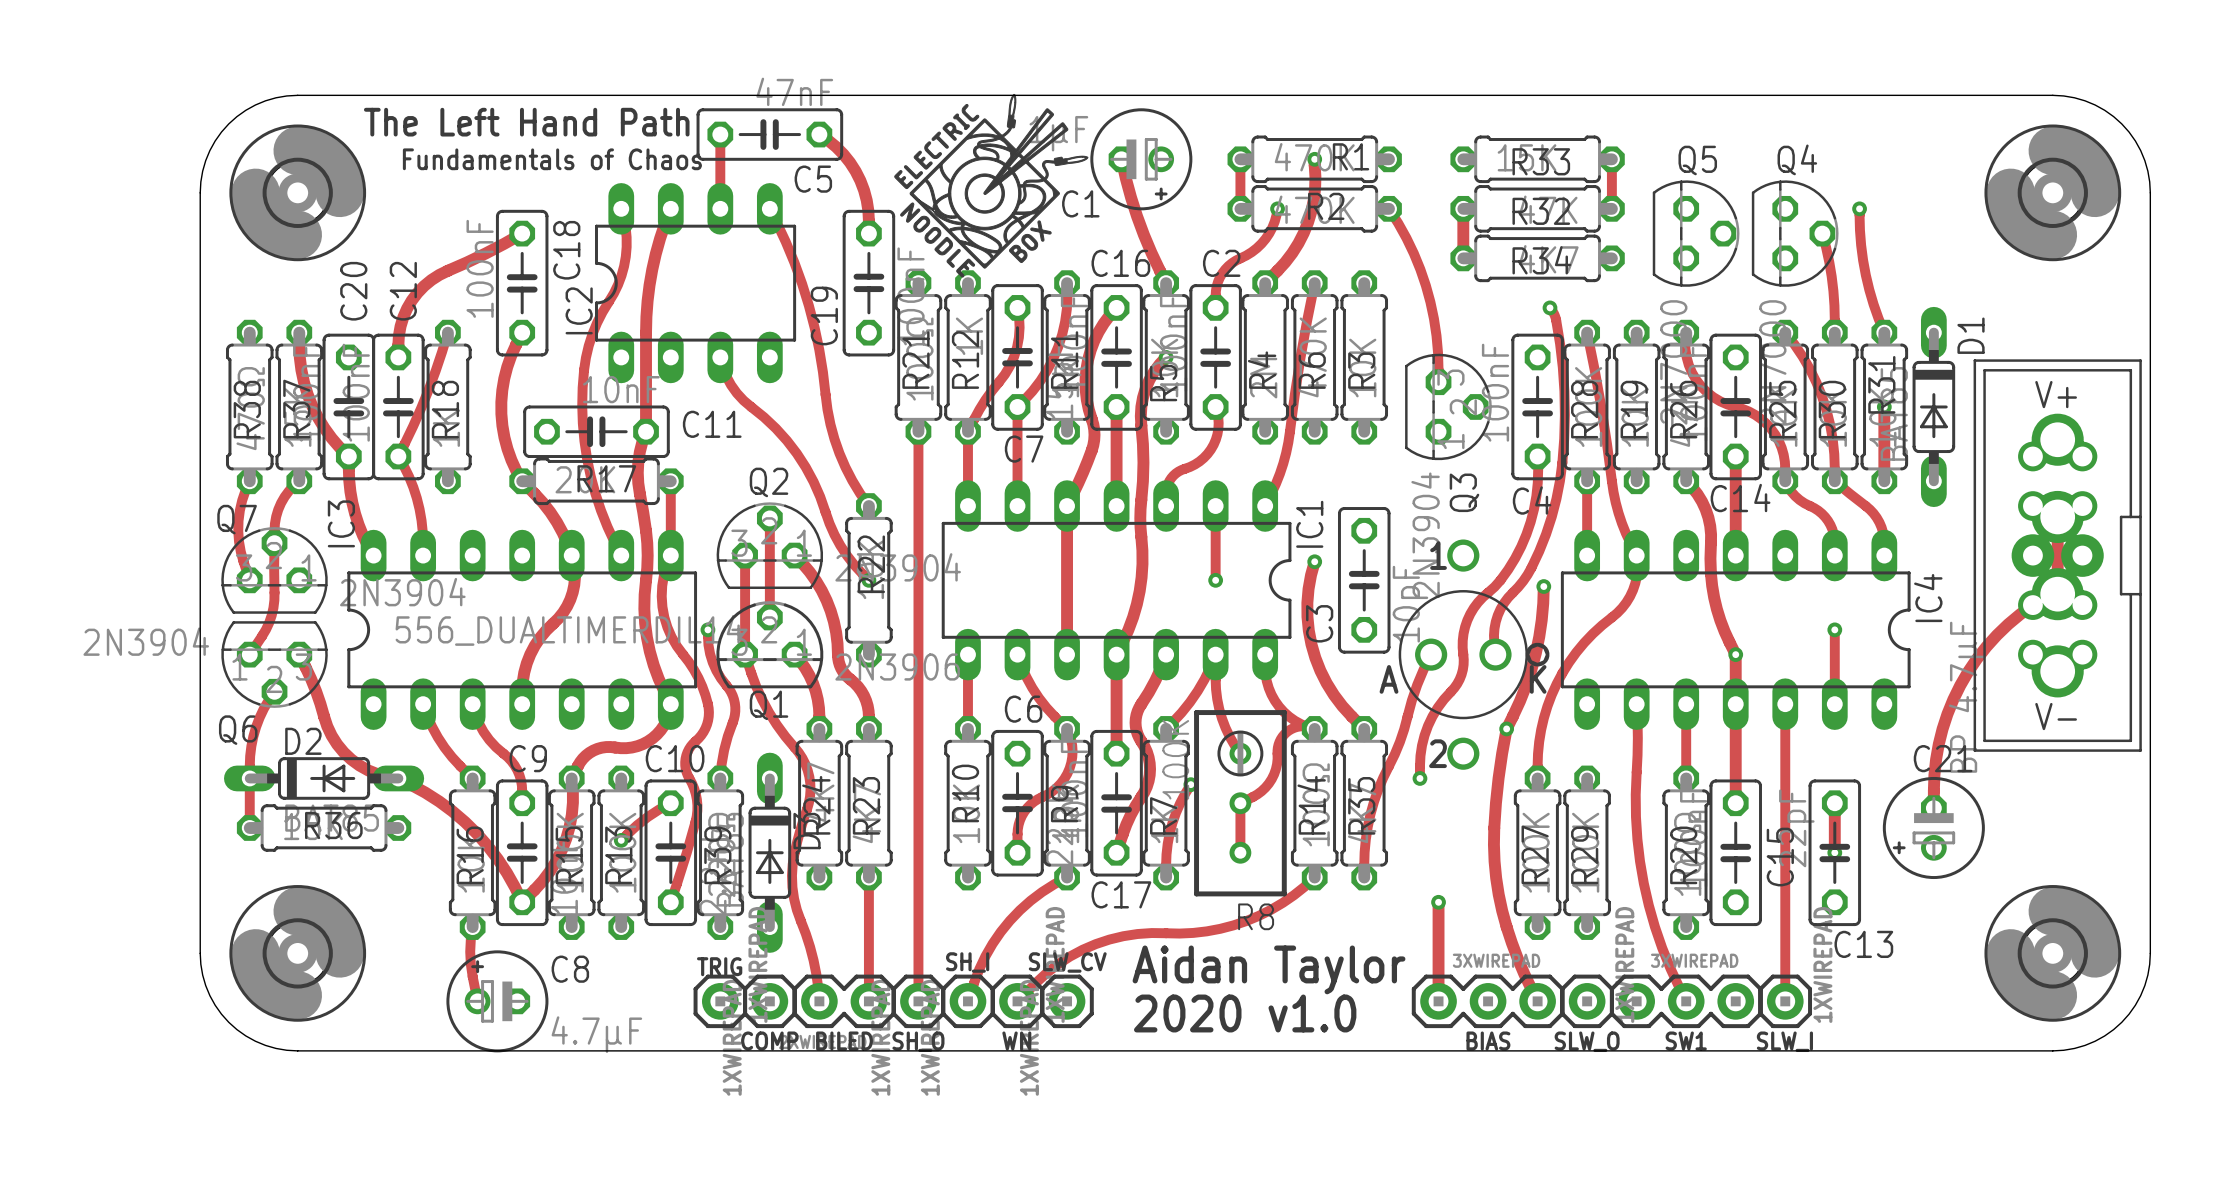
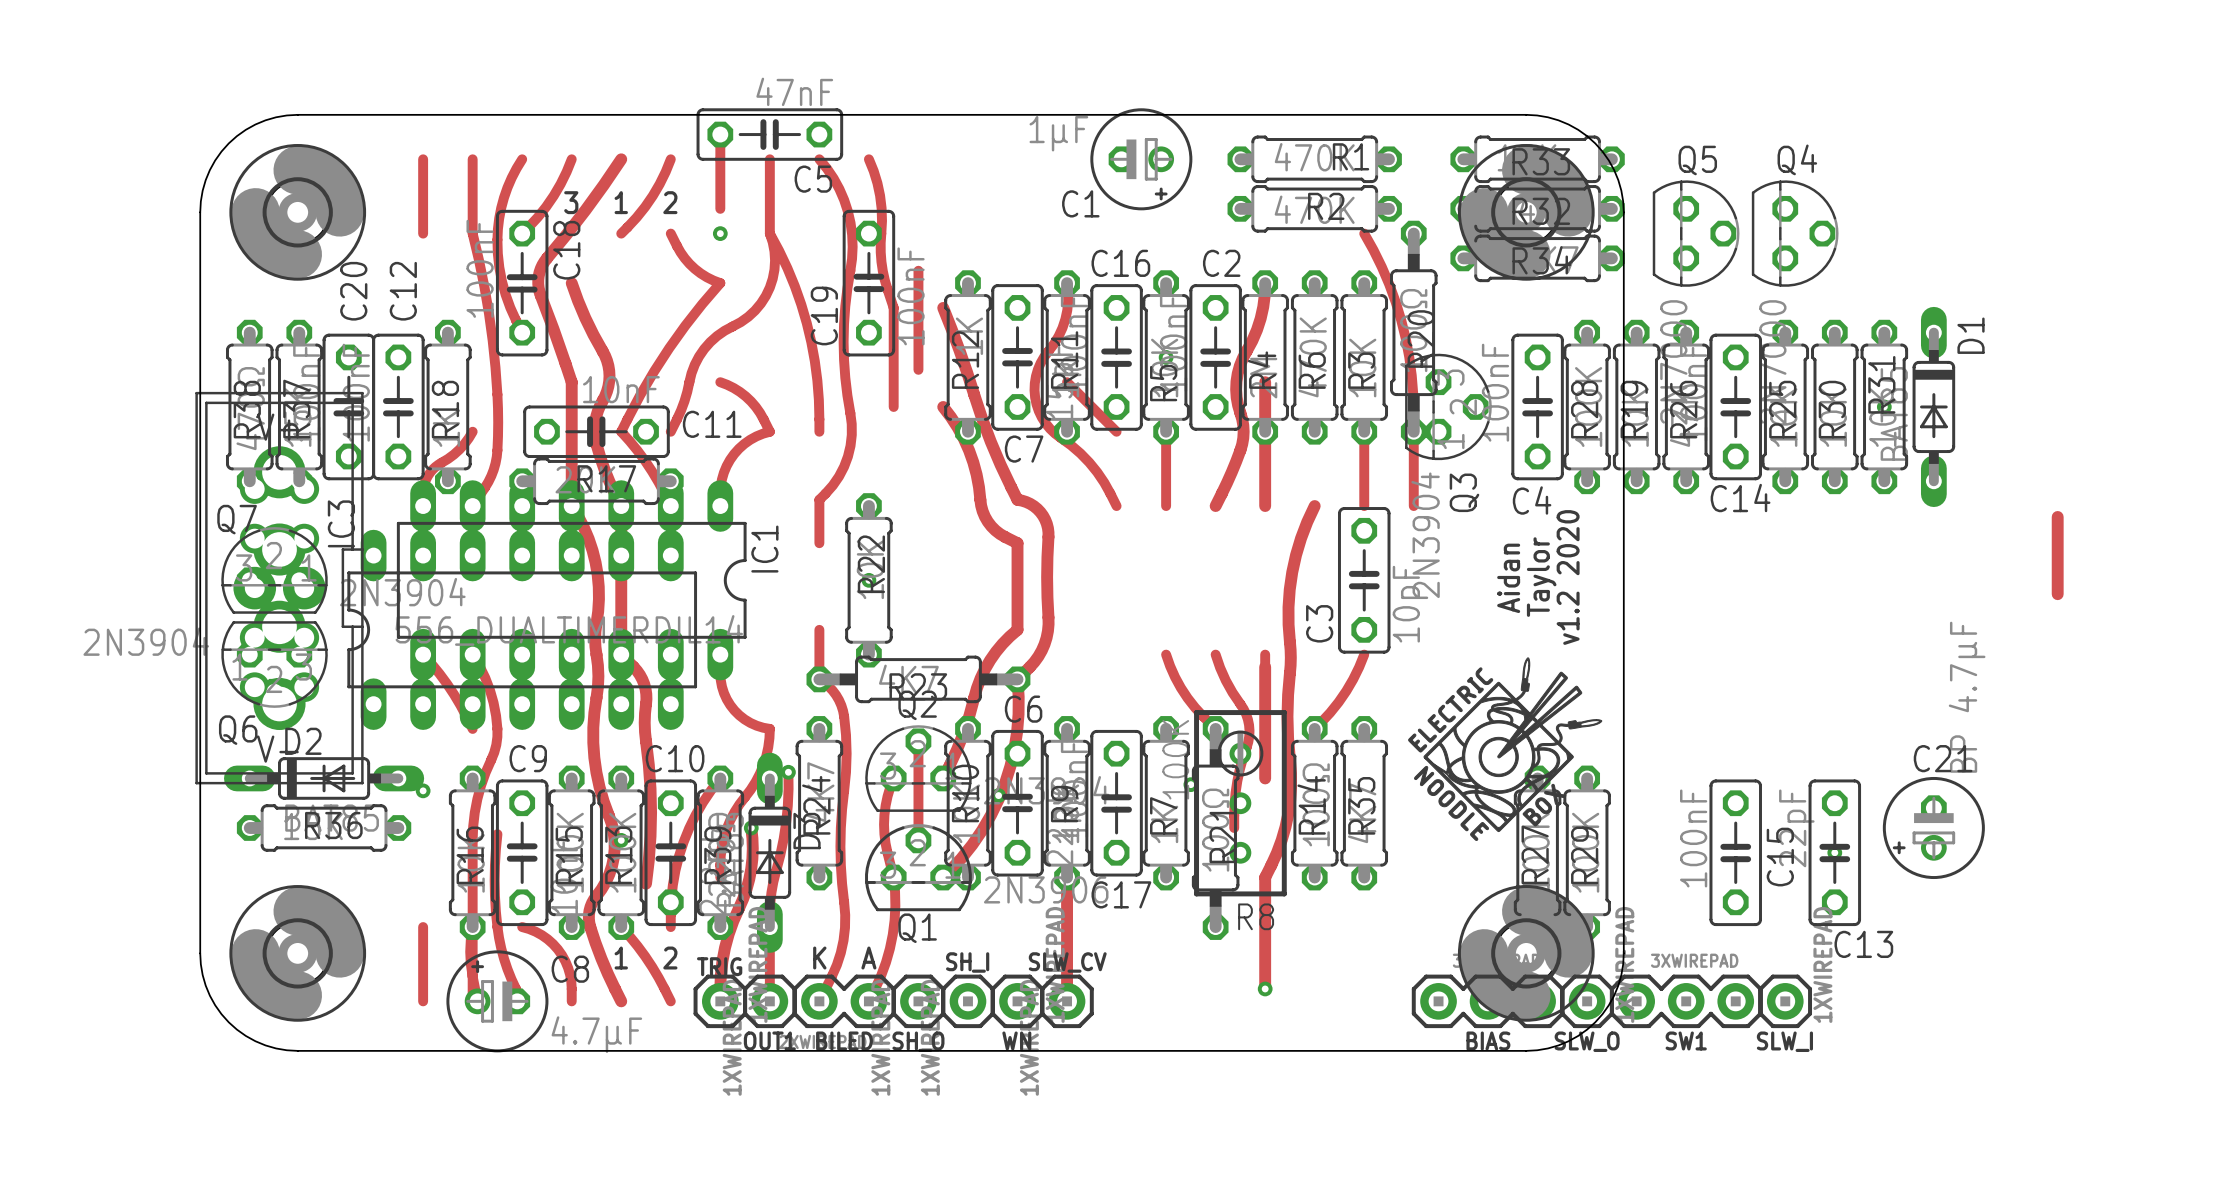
drawing: [894, 93, 1089, 278] -> none
text: The Left Hand Path (526, 122) -> none
track: (819, 134) (843, 154) (860, 180) (866, 200) (868, 233) -> none
track: none -> (423, 159) (423, 233)
track: none -> (472, 159) (472, 233) (484, 286) (492, 340) (498, 422) (497, 450) (493, 469) (488, 481) (472, 506)
text: Fundamentals of Chaos (552, 159) -> none
track: none -> (621, 159) (585, 210) (544, 261) (538, 280) (539, 291) (571, 382) (571, 506) (588, 538) (597, 574) (598, 599) (595, 639) (598, 676) (593, 742) (596, 772) (611, 823) (614, 849) (609, 874) (592, 903) (588, 918) (595, 942) (615, 988)
track: none -> (670, 159) (652, 195) (636, 217) (621, 233)
track: none -> (769, 159) (769, 233)
track: none -> (819, 159) (833, 178) (844, 200) (850, 223) (852, 246) (845, 306) (843, 341) (851, 434) (844, 466) (832, 485) (819, 499) (819, 543)
track: none -> (868, 159) (880, 195) (881, 261) (893, 307) (893, 406)
track: (1121, 159) (1137, 216) (1166, 283) -> none
track: (1240, 159) (1240, 208) -> none
track: (1314, 159) (1315, 188) (1308, 222) (1292, 253) (1265, 283) -> none
via: (1314, 159) -> none
track: (1611, 159) (1611, 208) -> none
part position: (297, 192) -> (297, 212)
part: (2052, 192) -> none
text: none -> 3 (571, 202)
text: none -> 1 (621, 202)
text: none -> 2 (670, 202)
track: (621, 208) (626, 237) (624, 266) (618, 284) (597, 323) (588, 345) (584, 369) (582, 405) (584, 441) (590, 476) (600, 510) (621, 555) -> none
track: (670, 208) (655, 254) (649, 285) (646, 332) (646, 431) (639, 451) (637, 472) (647, 543) (644, 608) (646, 637) (653, 665) (670, 704) (670, 709) (660, 730) (647, 741) (632, 747) (597, 748) (589, 752) (580, 762) (571, 778) (571, 814) (561, 849) (542, 880) (522, 902) (506, 872) (487, 846) (452, 811) (425, 792) (398, 778) (368, 770) (343, 752) (327, 726) (316, 691) (299, 654) -> none
track: (769, 208) (794, 262) (808, 305) (819, 349) (827, 409) (834, 439) (852, 480) (868, 506) -> none
track: (1277, 208) (1272, 227) (1261, 243) (1251, 252) (1232, 263) (1222, 273) (1216, 286) (1215, 307) -> none
via: (1277, 208) -> none
track: (1389, 208) (1406, 238) (1425, 285) (1436, 335) (1438, 382) -> none
track: (1463, 208) (1463, 258) -> none
track: (1859, 208) (1861, 245) (1865, 275) (1873, 304) (1884, 332) -> none
via: (1859, 208) -> none
board edge: (200, 212) (202, 171) (209, 150) (221, 132) (236, 116) (255, 105) (276, 97) (297, 95) (2052, 95) (2085, 100) (2104, 110) (2121, 123) (2135, 140) (2144, 160) (2150, 192) (2150, 953) (2144, 985) (2135, 1005) (2121, 1022) (2104, 1035) (2085, 1045) (2063, 1050) (1526, 1050) -> (200, 212) (205, 180) (221, 151) (245, 129) (265, 120) (286, 115) (1526, 114) (1558, 120) (1578, 129) (1595, 143) (1608, 160) (1618, 180) (1623, 212) (1623, 964) (1618, 985) (1608, 1005) (1587, 1029) (1558, 1045) (1526, 1050)
part: none -> (1526, 212)
track: (522, 233) (439, 274) (424, 286) (411, 300) (403, 317) (398, 335) (398, 357) -> (522, 233) (537, 217) (553, 195) (571, 159)
track: none -> (670, 233) (680, 252) (689, 263) (706, 277) (720, 283) (669, 348) (640, 394) (621, 431) (645, 461) (670, 506)
via: none -> (720, 233)
track: none -> (769, 233) (794, 286) (806, 323) (817, 380) (819, 431)
track: none -> (769, 233) (775, 260) (772, 278) (765, 295) (748, 316) (717, 336) (704, 349) (694, 364) (684, 401) (670, 431)
track: none -> (1364, 233) (1381, 266) (1395, 302) (1409, 356) (1413, 394) (1413, 506)
track: (1822, 233) (1831, 276) (1834, 332) -> none
R21 footprint: [894, 270, 943, 445] -> [1191, 716, 1240, 940]
track: none -> (571, 283) (585, 318) (605, 355) (609, 370) (608, 386) (596, 416) (594, 433) (604, 469) (621, 506) (621, 654) (639, 674) (646, 694) (645, 732) (651, 812) (646, 883)
IC2: (695, 283) -> none
track: (1067, 283) (1066, 308) (1058, 346) (1040, 380) (1017, 406) (1017, 506) -> (1067, 283) (1067, 310) (1062, 327) (1040, 363) (1035, 376) (1034, 390) (1036, 404) (1041, 417) (1050, 428) (1080, 453) (1097, 472) (1116, 506)
track: (1314, 283) (1300, 357) (1286, 453) (1279, 473) (1265, 506) -> (1265, 382) (1265, 506)
track: none -> (943, 307) (990, 441) (1011, 487) (1017, 499) (1033, 506) (1043, 515) (1046, 523) (1048, 624) (1041, 650) (1034, 661) (1017, 679) (1018, 714) (1014, 749) (998, 799) (972, 844) (943, 877)
track: (1017, 307) (1018, 337) (1014, 356) (1004, 374) (979, 409) (967, 431) (967, 506) -> none
track: (1116, 307) (1103, 323) (1094, 340) (1086, 369) (1086, 399) (1093, 424) (1094, 440) (1083, 472) (1067, 506) (1067, 654) -> none
track: (1549, 307) (1556, 320) (1564, 391) (1564, 438) (1559, 480) (1551, 516) (1539, 551) (1527, 574) (1504, 603) (1497, 615) (1493, 635) (1495, 654) -> none
via: (1549, 307) -> none
track: (299, 332) (301, 370) (307, 394) (324, 428) (348, 456) (350, 491) (355, 513) (362, 535) (373, 555) -> none
track: (447, 332) (428, 389) (398, 456) (409, 476) (416, 498) (421, 520) (423, 555) -> none
track: (522, 332) (511, 355) (504, 378) (501, 402) (504, 437) (511, 460) (522, 481) (542, 502) (562, 532) (571, 555) (574, 577) (572, 592) (567, 606) (540, 637) (530, 654) (524, 672) (522, 704) -> (522, 332) (510, 307) (501, 281) (497, 239) (499, 218) (503, 197) (511, 177) (522, 159)
track: (1587, 332) (1601, 406) (1613, 491) (1621, 523) (1636, 555) (1636, 576) (1633, 590) (1626, 602) (1584, 642) (1568, 662) (1556, 683) (1547, 706) (1541, 729) (1537, 778) -> none
track: (1686, 332) (1686, 357) (1696, 379) (1713, 397) (1755, 415) (1771, 429) (1778, 441) (1783, 454) (1785, 481) (1787, 486) (1799, 500) (1818, 510) (1828, 520) (1833, 533) (1834, 555) -> none
track: (1785, 332) (1802, 356) (1822, 396) (1832, 439) (1834, 481) (1869, 509) (1876, 517) (1883, 532) (1884, 555) -> none
track: (720, 357) (726, 376) (736, 393) (775, 428) (796, 453) (813, 481) (840, 545) (854, 565) (868, 580) -> none
track: (1166, 357) (1149, 379) (1141, 406) (1143, 462) (1140, 518) (1141, 577) (1133, 617) (1116, 654) (1116, 753) -> none
track: none -> (720, 382) (733, 388) (751, 401) (760, 412) (769, 431) (756, 436) (744, 443) (730, 459) (721, 479) (720, 506)
track: none -> (1067, 382) (1116, 431)
track: none -> (943, 406) (957, 427) (969, 450) (976, 474) (981, 505) (984, 516) (995, 530) (1017, 543) (1017, 629) (996, 651) (984, 669) (976, 688) (963, 732) (943, 778)
track: (1116, 406) (1116, 506) -> (918, 270) (918, 369)
track: (1215, 406) (1218, 428) (1213, 444) (1199, 461) (1173, 475) (1168, 483) (1166, 493) -> (1166, 431) (1166, 493)
track: (1884, 406) (1884, 481) -> none
track: none -> (472, 431) (459, 449) (435, 466) (428, 475) (423, 486) (423, 506)
track: (918, 431) (918, 741) -> none
track: (1537, 456) (1536, 496) (1526, 534) (1508, 569) (1494, 586) (1478, 602) (1467, 620) (1462, 640) (1463, 664) (1461, 674) (1454, 688) (1437, 707) (1428, 725) (1422, 745) (1419, 778) -> none
track: (1735, 456) (1735, 555) -> none
track: (249, 481) (239, 510) (238, 531) (240, 551) (249, 580) -> none
track: (299, 481) (284, 496) (276, 516) (273, 607) (266, 629) (249, 654) -> none
track: (670, 481) (670, 555) (662, 585) (662, 606) (671, 637) (693, 669) (702, 686) (708, 712) (705, 728) (690, 746) (685, 758) (686, 772) (695, 793) (697, 810) (686, 852) (670, 902) -> none
track: (1587, 481) (1587, 555) -> (1364, 431) (1364, 506)
track: (1686, 481) (1702, 501) (1708, 517) (1714, 597) (1720, 620) (1735, 654) (1735, 803) -> none
track: (1215, 506) (1215, 580) -> (1215, 506) (1242, 444) (1243, 425) (1236, 397) (1236, 381) (1239, 365) (1260, 318) (1265, 283)
track: none -> (1314, 506) (1301, 538) (1289, 589) (1288, 624) (1290, 657) (1287, 716) (1291, 786) (1285, 827) (1276, 852) (1265, 877) (1265, 988)
track: (769, 518) (769, 617) -> none
IC1 name position: IC1 (1309, 524) -> IC1 (764, 549)
Q2 position: (769, 545) -> (918, 768)
track: (745, 555) (745, 654) (762, 699) (776, 724) (802, 758) (809, 776) (810, 796) (794, 852) (792, 887) (796, 909) (813, 960) (819, 1001) -> (819, 629) (819, 679) (832, 690) (841, 705) (844, 716) (846, 753) (840, 846) (845, 927) (836, 964) (819, 1001)
track: (794, 555) (816, 581) (826, 600) (836, 632) (839, 665) (845, 674) (858, 686) (864, 695) (868, 711) (868, 728) -> none
part: (2057, 555) -> none
track: (1314, 561) (1308, 588) (1307, 616) (1315, 657) (1334, 695) (1364, 728) -> none
via: (1314, 561) -> none
text: none -> Taylor (1541, 577)
text: none -> v1.2 2020 (1568, 577)
text: none -> Aidan (1508, 578)
IC1 position: (1116, 580) -> (571, 580)
via: (1215, 580) -> none
track: (1543, 586) (1541, 620) (1535, 653) (1526, 685) (1506, 728) (1498, 778) (1494, 827) (1494, 861) (1502, 910) (1511, 942) (1531, 988) -> none
via: (1543, 586) -> none
part: none -> (279, 588)
track: (2057, 594) (2032, 605) (2008, 624) (1986, 646) (1960, 685) (1947, 714) (1938, 744) (1934, 775) (1933, 808) -> none
track: (707, 629) (708, 645) (712, 662) (731, 692) (735, 707) (733, 718) (724, 750) (720, 778) -> (670, 927) (672, 885) (683, 842) (695, 815) (720, 778)
via: (707, 629) -> none
IC4: (1735, 629) -> none
track: (1834, 629) (1834, 704) -> none
via: (1834, 629) -> none
Q1 position: (769, 644) -> (918, 867)
track: none -> (423, 654) (447, 683) (472, 728)
track: none -> (472, 654) (489, 690) (497, 728) (496, 744) (480, 785) (473, 826) (472, 1001)
track: none -> (720, 654) (721, 686) (730, 705) (739, 715) (750, 722) (769, 728) (768, 747) (759, 773) (734, 812) (726, 828) (720, 855) (720, 877)
track: (794, 654) (809, 675) (815, 691) (818, 708) (819, 728) -> none
track: (967, 654) (967, 728) -> none
track: (1017, 654) (1026, 677) (1038, 698) (1067, 728) (1072, 751) (1069, 768) (1060, 783) (1052, 791) (1030, 804) (1021, 815) (1017, 829) (1017, 852) -> none
track: (1166, 654) (1155, 680) (1136, 714) (1136, 730) (1148, 757) (1149, 775) (1144, 791) (1126, 824) (1116, 852) -> (1166, 654) (1175, 677) (1187, 698) (1215, 728)
track: none -> (1215, 654) (1225, 680) (1246, 714) (1249, 725) (1248, 742) (1239, 769) (1235, 792) (1234, 827)
track: none -> (1364, 654) (1346, 691) (1330, 712) (1314, 728)
track: (1431, 654) (1417, 684) (1399, 741) (1374, 801) (1365, 839) (1364, 877) -> none
part: (1474, 654) -> none
via: (1735, 654) -> none
drawing: none -> [1408, 657, 1603, 841]
track: (1265, 667) (1268, 688) (1279, 706) (1295, 720) (1301, 724) (1307, 726) (1314, 728) (1300, 726) (1291, 729) (1284, 734) (1278, 744) (1277, 764) (1271, 779) (1261, 791) (1240, 803) (1240, 852) -> (1265, 667) (1265, 778)
track: (274, 691) (259, 717) (251, 746) (249, 827) -> none
track: (423, 704) (432, 726) (444, 747) (472, 778) -> none
track: (472, 704) (483, 731) (496, 747) (511, 761) (517, 770) (521, 785) (522, 803) -> none
track: (1636, 704) (1635, 816) (1640, 861) (1654, 926) (1680, 988) -> none
track: (1686, 704) (1686, 778) -> none
track: (1785, 704) (1785, 1001) -> none
R23 footprint: [845, 716, 893, 891] -> [806, 655, 1031, 704]
track: (1166, 728) (1181, 712) (1197, 691) (1215, 654) (1216, 689) (1219, 708) (1225, 727) (1240, 753) -> none
via: (1506, 728) -> none
R20 footprint: [1662, 765, 1710, 940] -> [1390, 220, 1438, 445]
track: none -> (788, 772) (786, 822) (770, 903) (769, 1001)
via: none -> (788, 772)
via: (1419, 778) -> none
track: (1190, 784) (1175, 812) (1169, 833) (1166, 877) -> none
via: none -> (423, 790)
via: none -> (998, 795)
track: (670, 803) (647, 816) (621, 840) -> none
track: (1834, 803) (1834, 852) -> none
track: none -> (751, 827) (752, 848) (751, 869) (746, 889) (725, 947) (720, 975) (720, 1001)
via: none -> (751, 827)
track: none -> (497, 834) (494, 880) (497, 927) (507, 969) (522, 1001)
track: (918, 840) (918, 1001) -> none
track: (868, 877) (868, 1001) -> (893, 778) (885, 805) (884, 824) (885, 843) (893, 877) (894, 920) (885, 962) (868, 1001)
track: (1067, 877) (1030, 900) (1000, 931) (979, 969) (967, 1001) -> none
track: (1314, 877) (1294, 895) (1271, 909) (1233, 925) (1193, 932) (1137, 934) (1095, 944) (1057, 964) (1017, 1001) -> none
track: none -> (1067, 889) (1067, 1001)
track: (1438, 902) (1438, 1001) -> none
via: (1438, 902) -> none
track: none -> (423, 927) (423, 1001)
track: none -> (522, 927) (535, 931) (547, 939) (561, 955) (570, 974) (571, 1001)
track: none -> (621, 927) (645, 956) (670, 1001)
part: none -> (1526, 953)
part: (2052, 953) -> none
text: none -> 1 (621, 958)
text: none -> 2 (670, 958)
text: none -> K (819, 958)
text: none -> A (868, 958)
text: Aidan Taylor (1269, 969) -> none
track: none -> (615, 988) (621, 1001)
via: none -> (1265, 988)
text: 2020 v1.0 (1245, 1013) -> none
COMP name: COMP (769, 1040) -> OUT1 (769, 1040)

